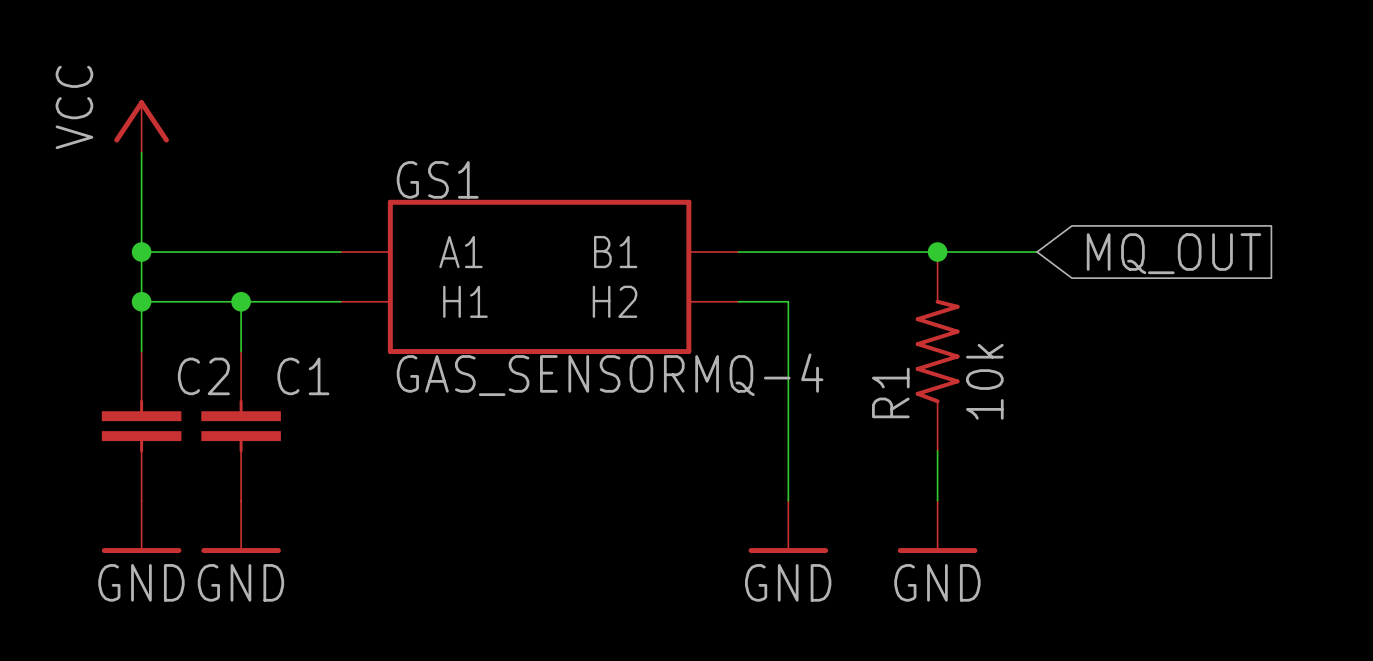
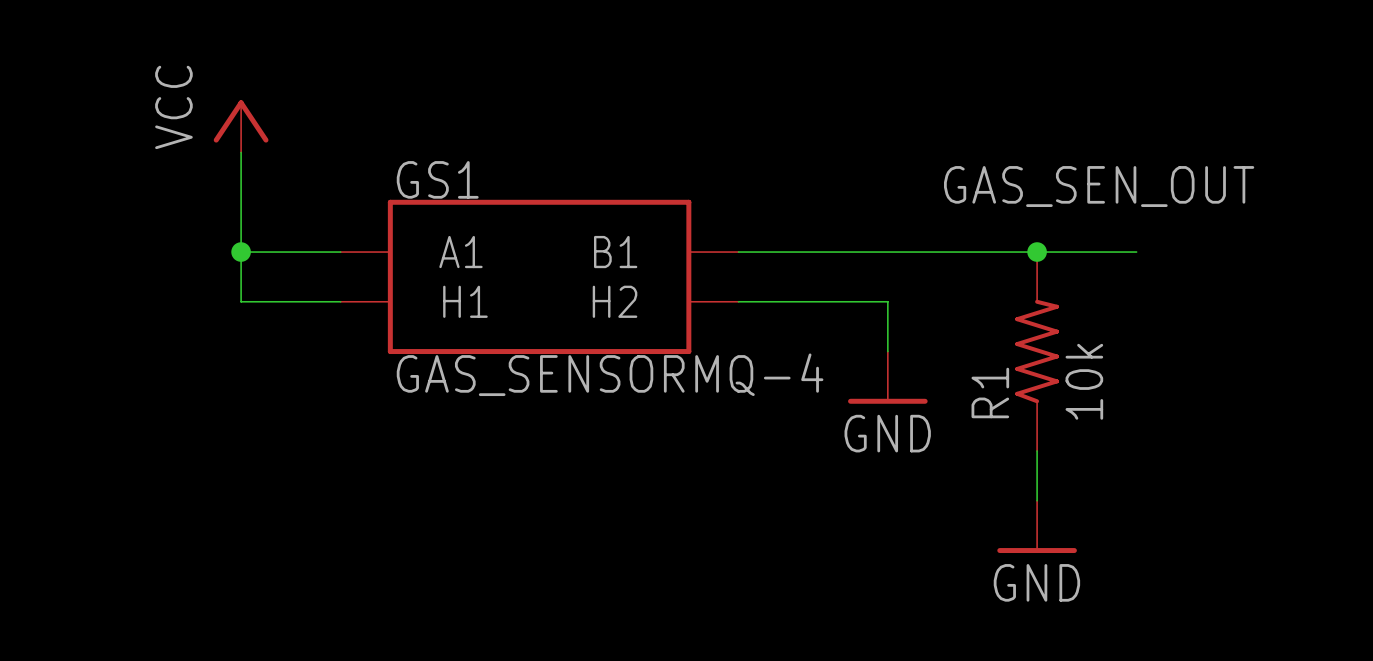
power symbol position: VCC (141, 126) -> VCC (241, 126)
wire: (141, 152) (141, 351) -> none
wire: none -> (241, 152) (241, 301)
label: none -> GAS_SEN_OUT (1099, 186)
wire: (141, 252) (241, 252) -> none
junction: (141, 252) -> none
junction: none -> (241, 252)
junction position: (937, 252) -> (1037, 252)
wire: none -> (1037, 252) (1136, 252)
global label: MQ_OUT (1173, 253) -> none
wire: (141, 301) (241, 301) (241, 351) -> none
junction: (141, 301) -> none
junction: (241, 301) -> none
wire: (788, 301) (788, 500) -> (788, 301) (887, 301) (887, 351)
R1 position: (937, 351) -> (1037, 351)
power symbol: none -> GND (887, 377)
C2: (141, 426) -> none
C1: (241, 426) -> none
wire: (937, 451) (937, 500) -> (1037, 451) (1037, 500)
power symbol: GND (141, 526) -> none
power symbol: GND (241, 526) -> none
power symbol: GND (788, 526) -> none
power symbol: GND (937, 526) -> none
power symbol: none -> GND (1037, 526)

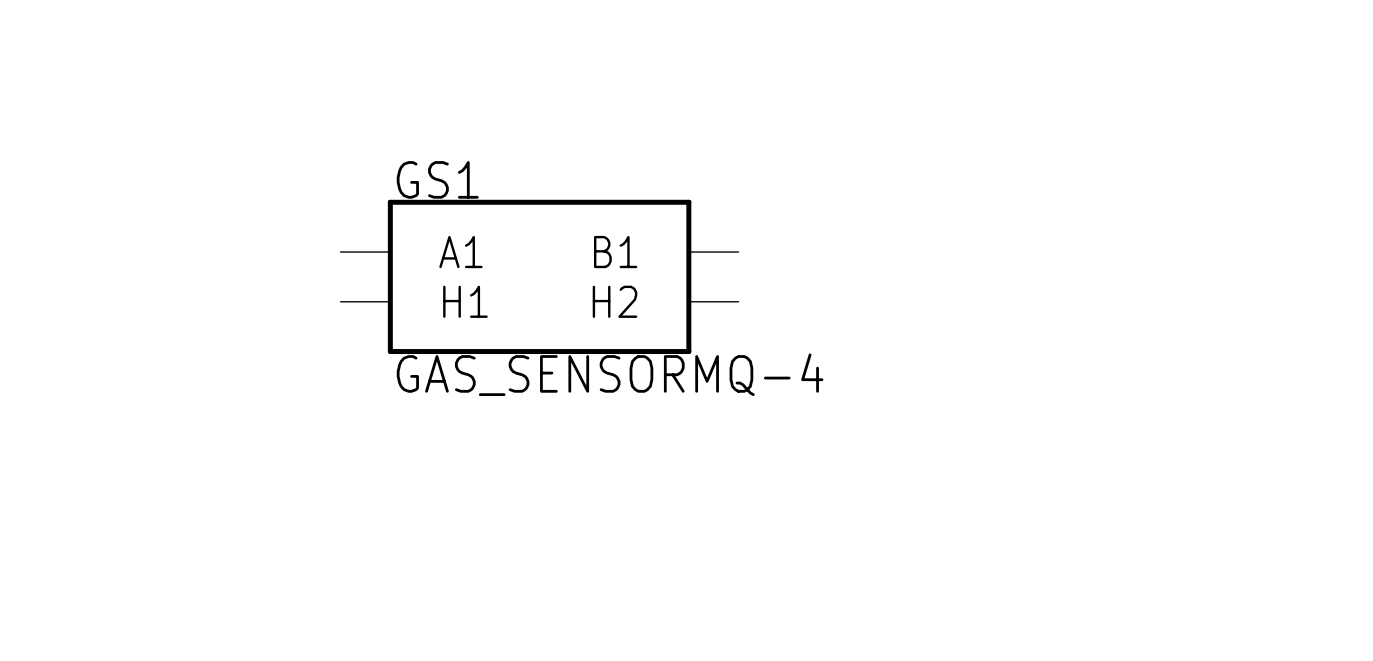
power symbol: VCC (241, 126) -> none
wire: (241, 152) (241, 301) (340, 301) -> none
label: GAS_SEN_OUT (1099, 186) -> none
wire: (241, 252) (340, 252) -> none
junction: (241, 252) -> none
wire: (738, 252) (1136, 252) -> none
junction: (1037, 252) -> none
wire: (738, 301) (887, 301) (887, 351) -> none
R1: 10k (1037, 351) -> none
power symbol: GND (887, 377) -> none
wire: (1037, 451) (1037, 500) -> none
power symbol: GND (1037, 526) -> none

